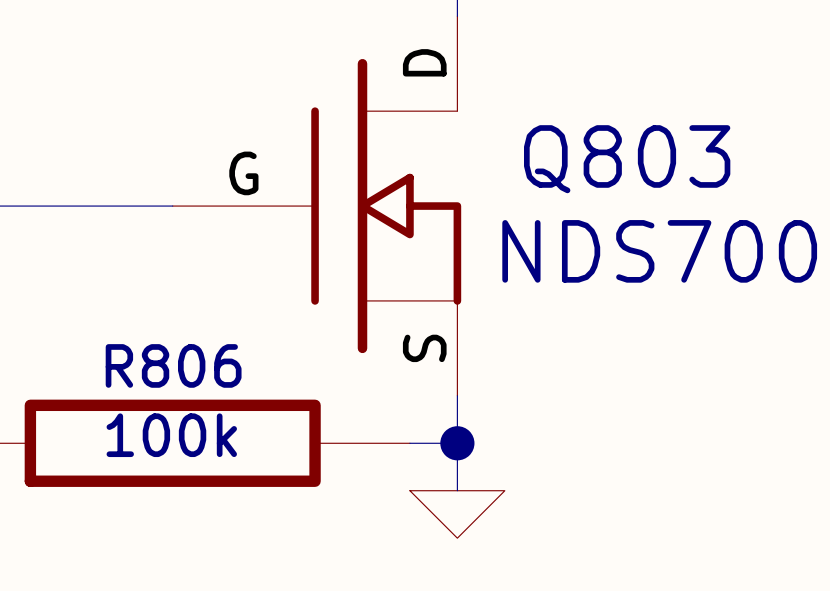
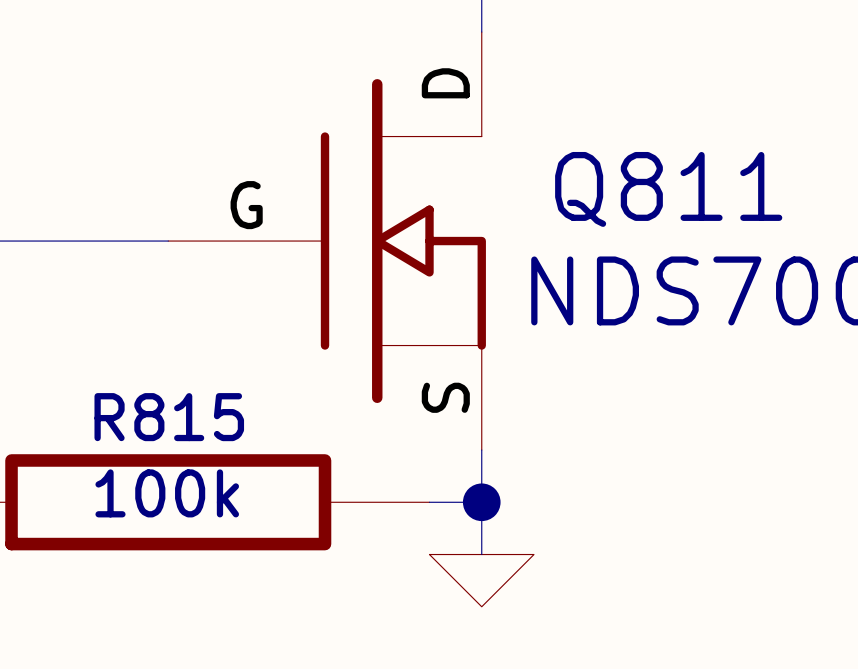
Q803 name: Q803 (627, 159) -> Q811 (668, 189)
R806 name: R806 (173, 365) -> R815 (169, 417)

